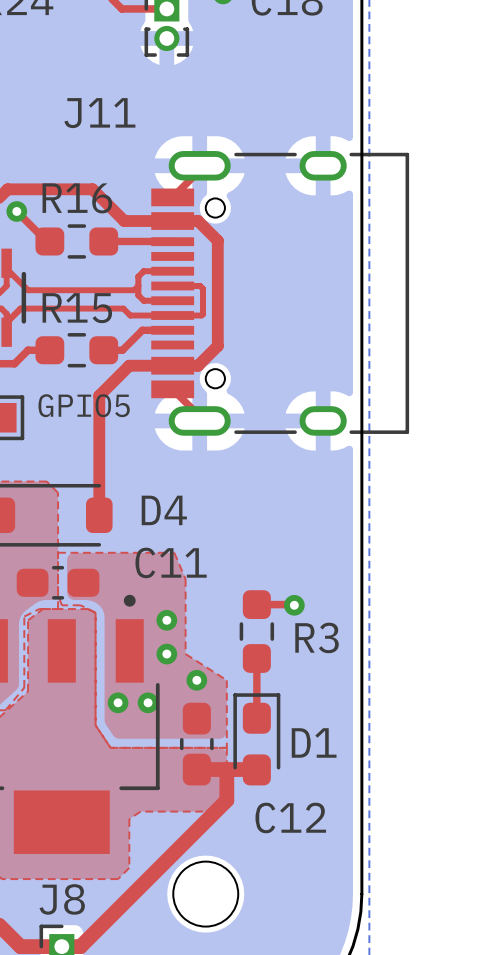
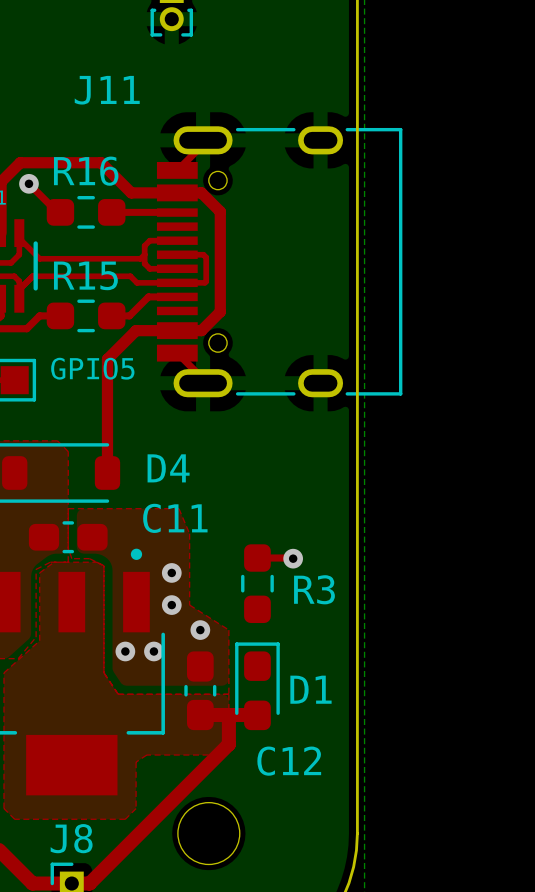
top track: (256, 658) (256, 718) -> none

